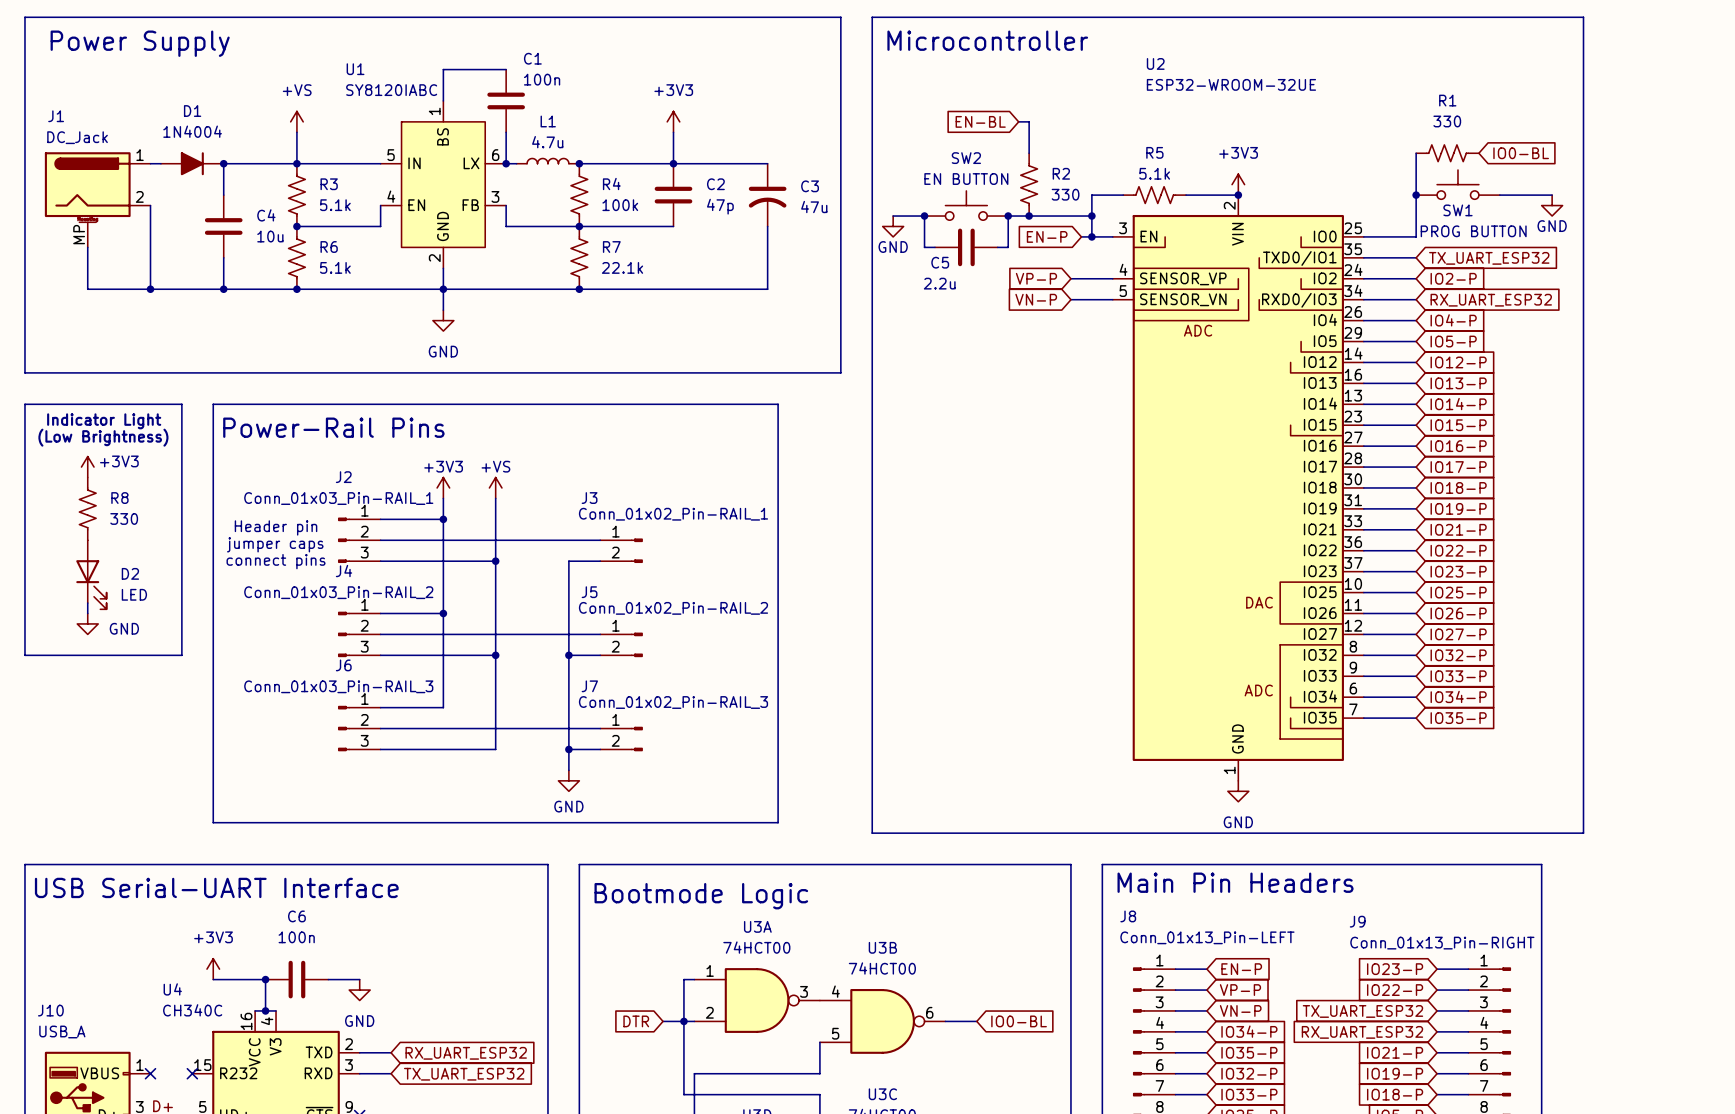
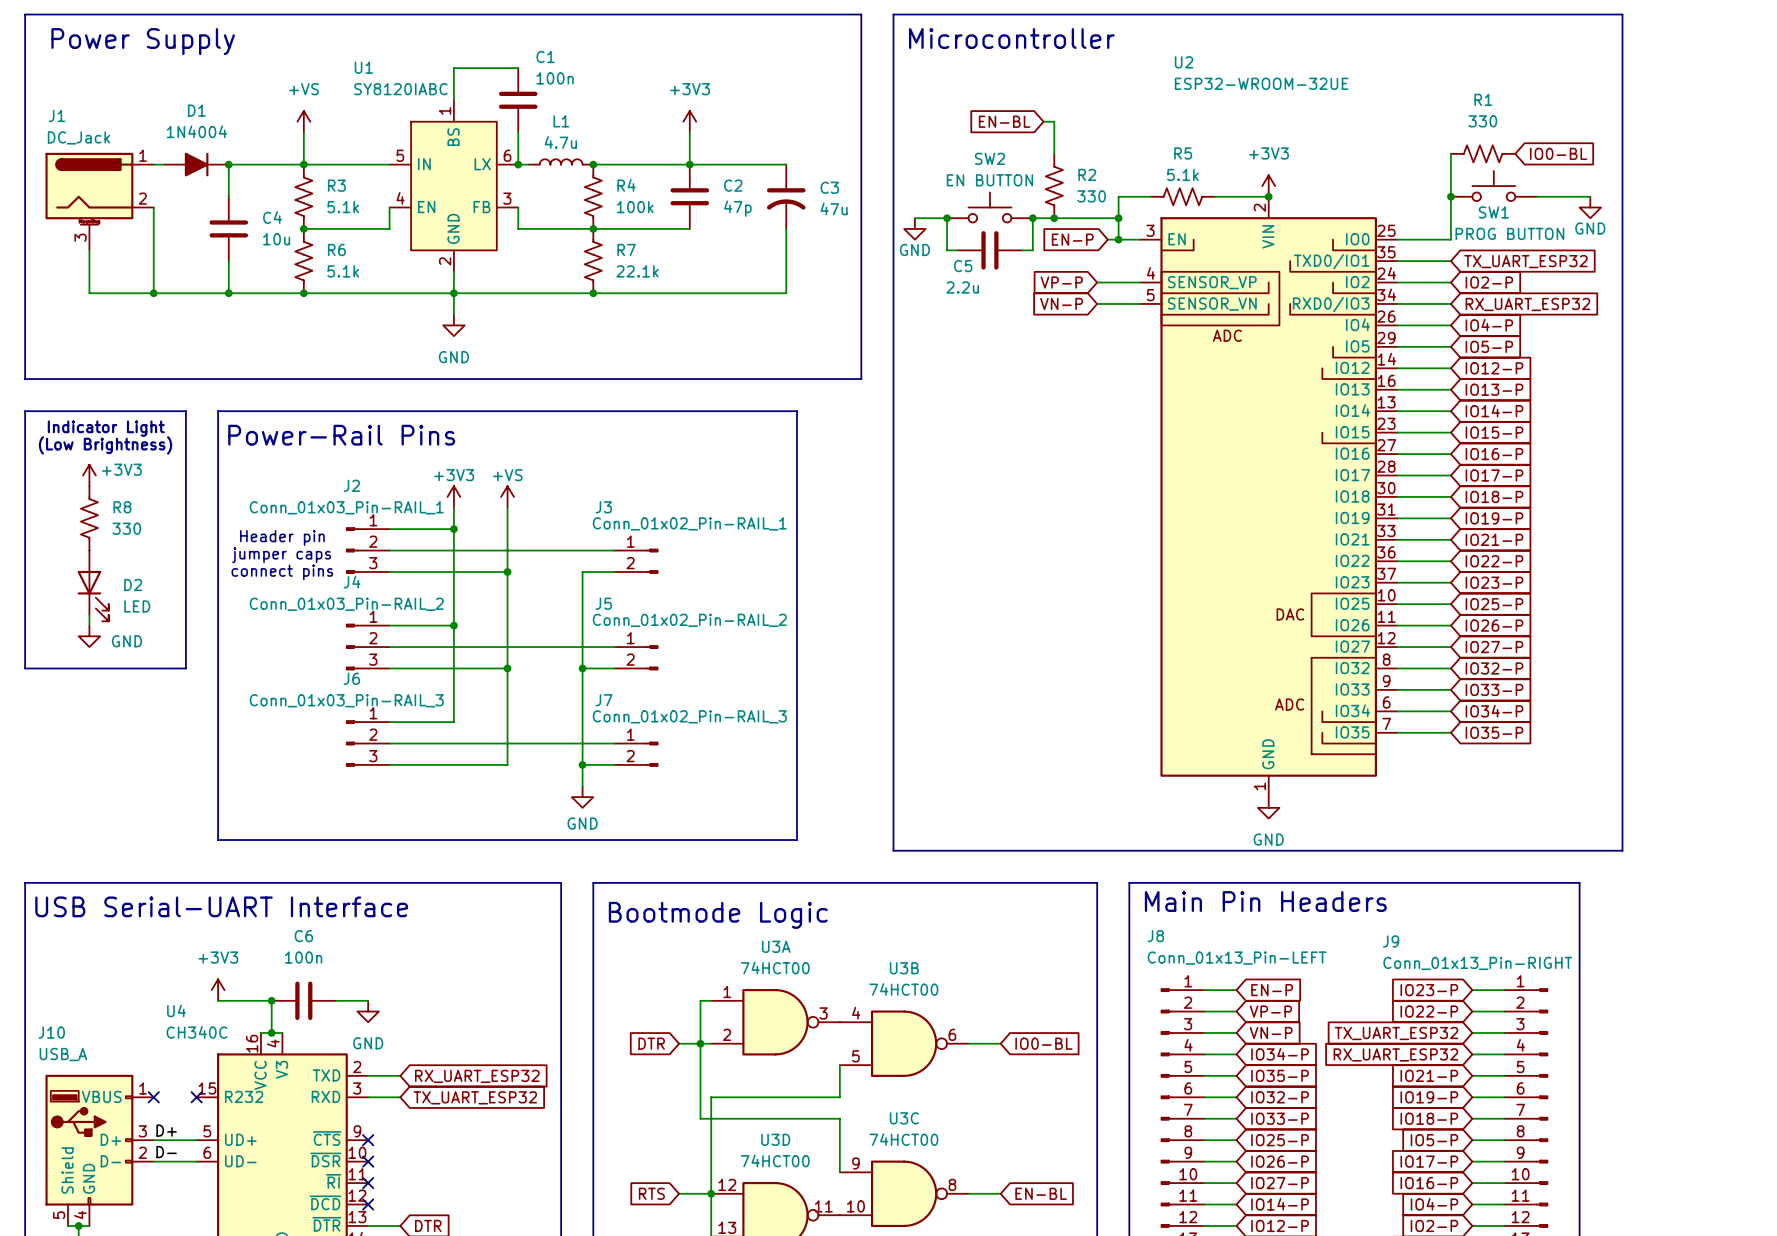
J1 pin number: MP (79, 234) -> 3 (80, 237)

